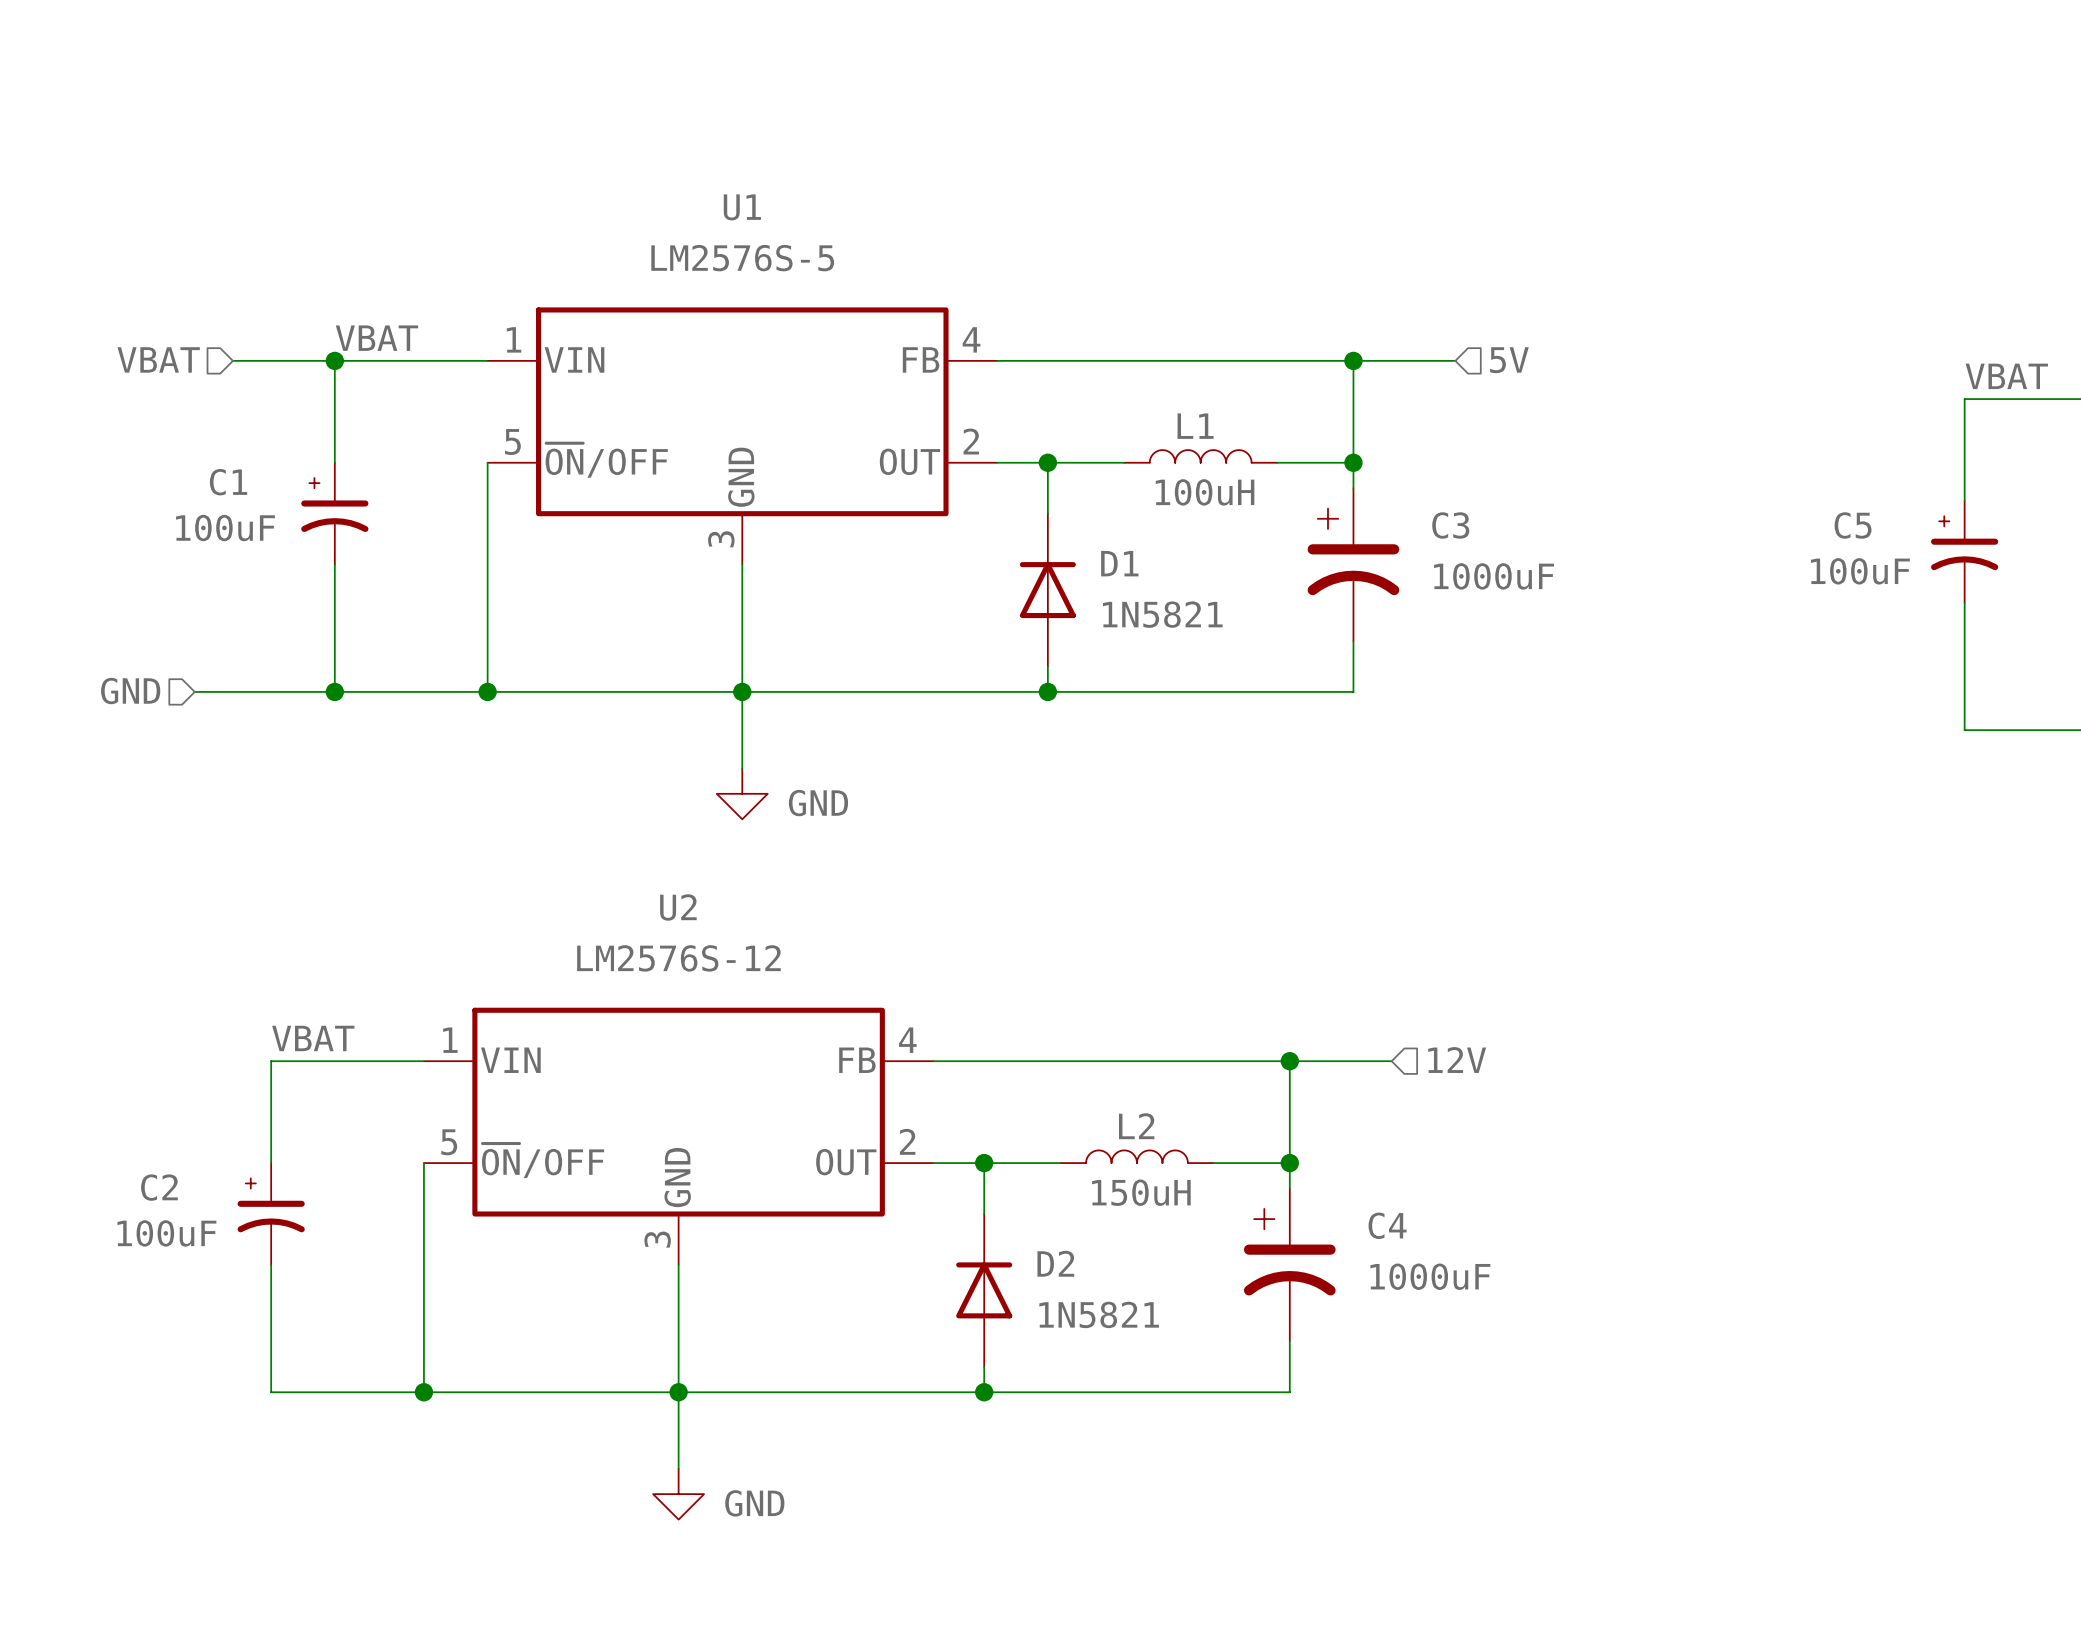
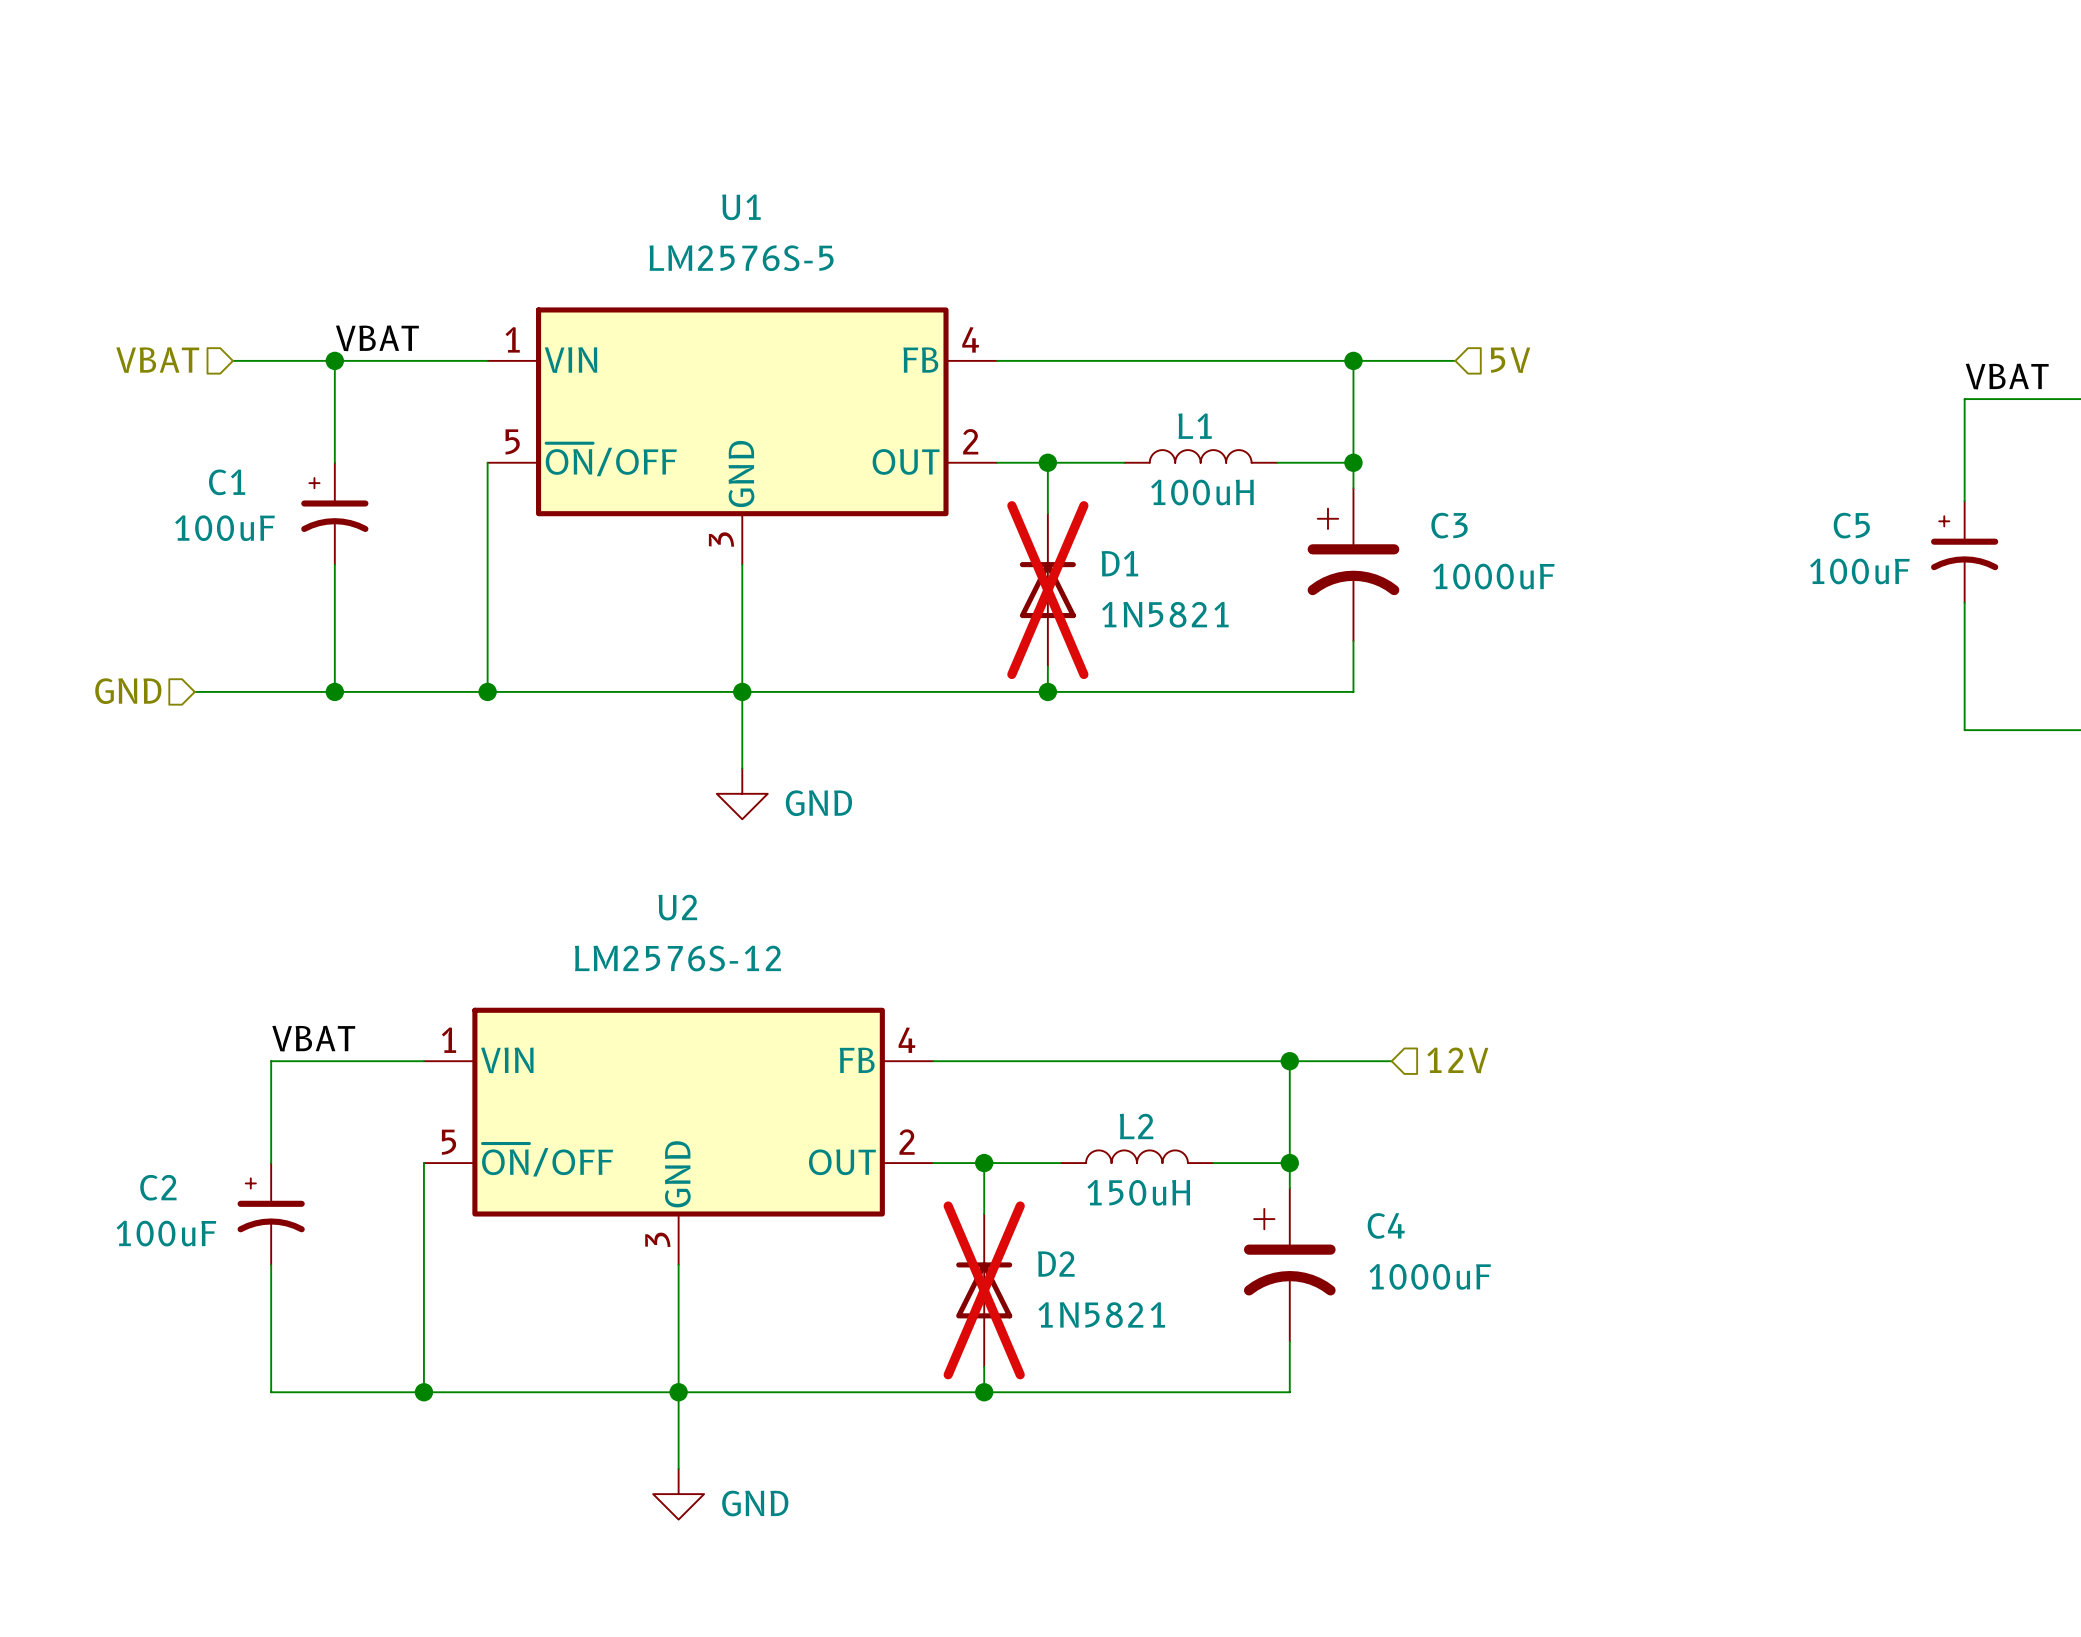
D1 do-not-place cross: none -> (1047, 590)
D2 do-not-place cross: none -> (984, 1290)

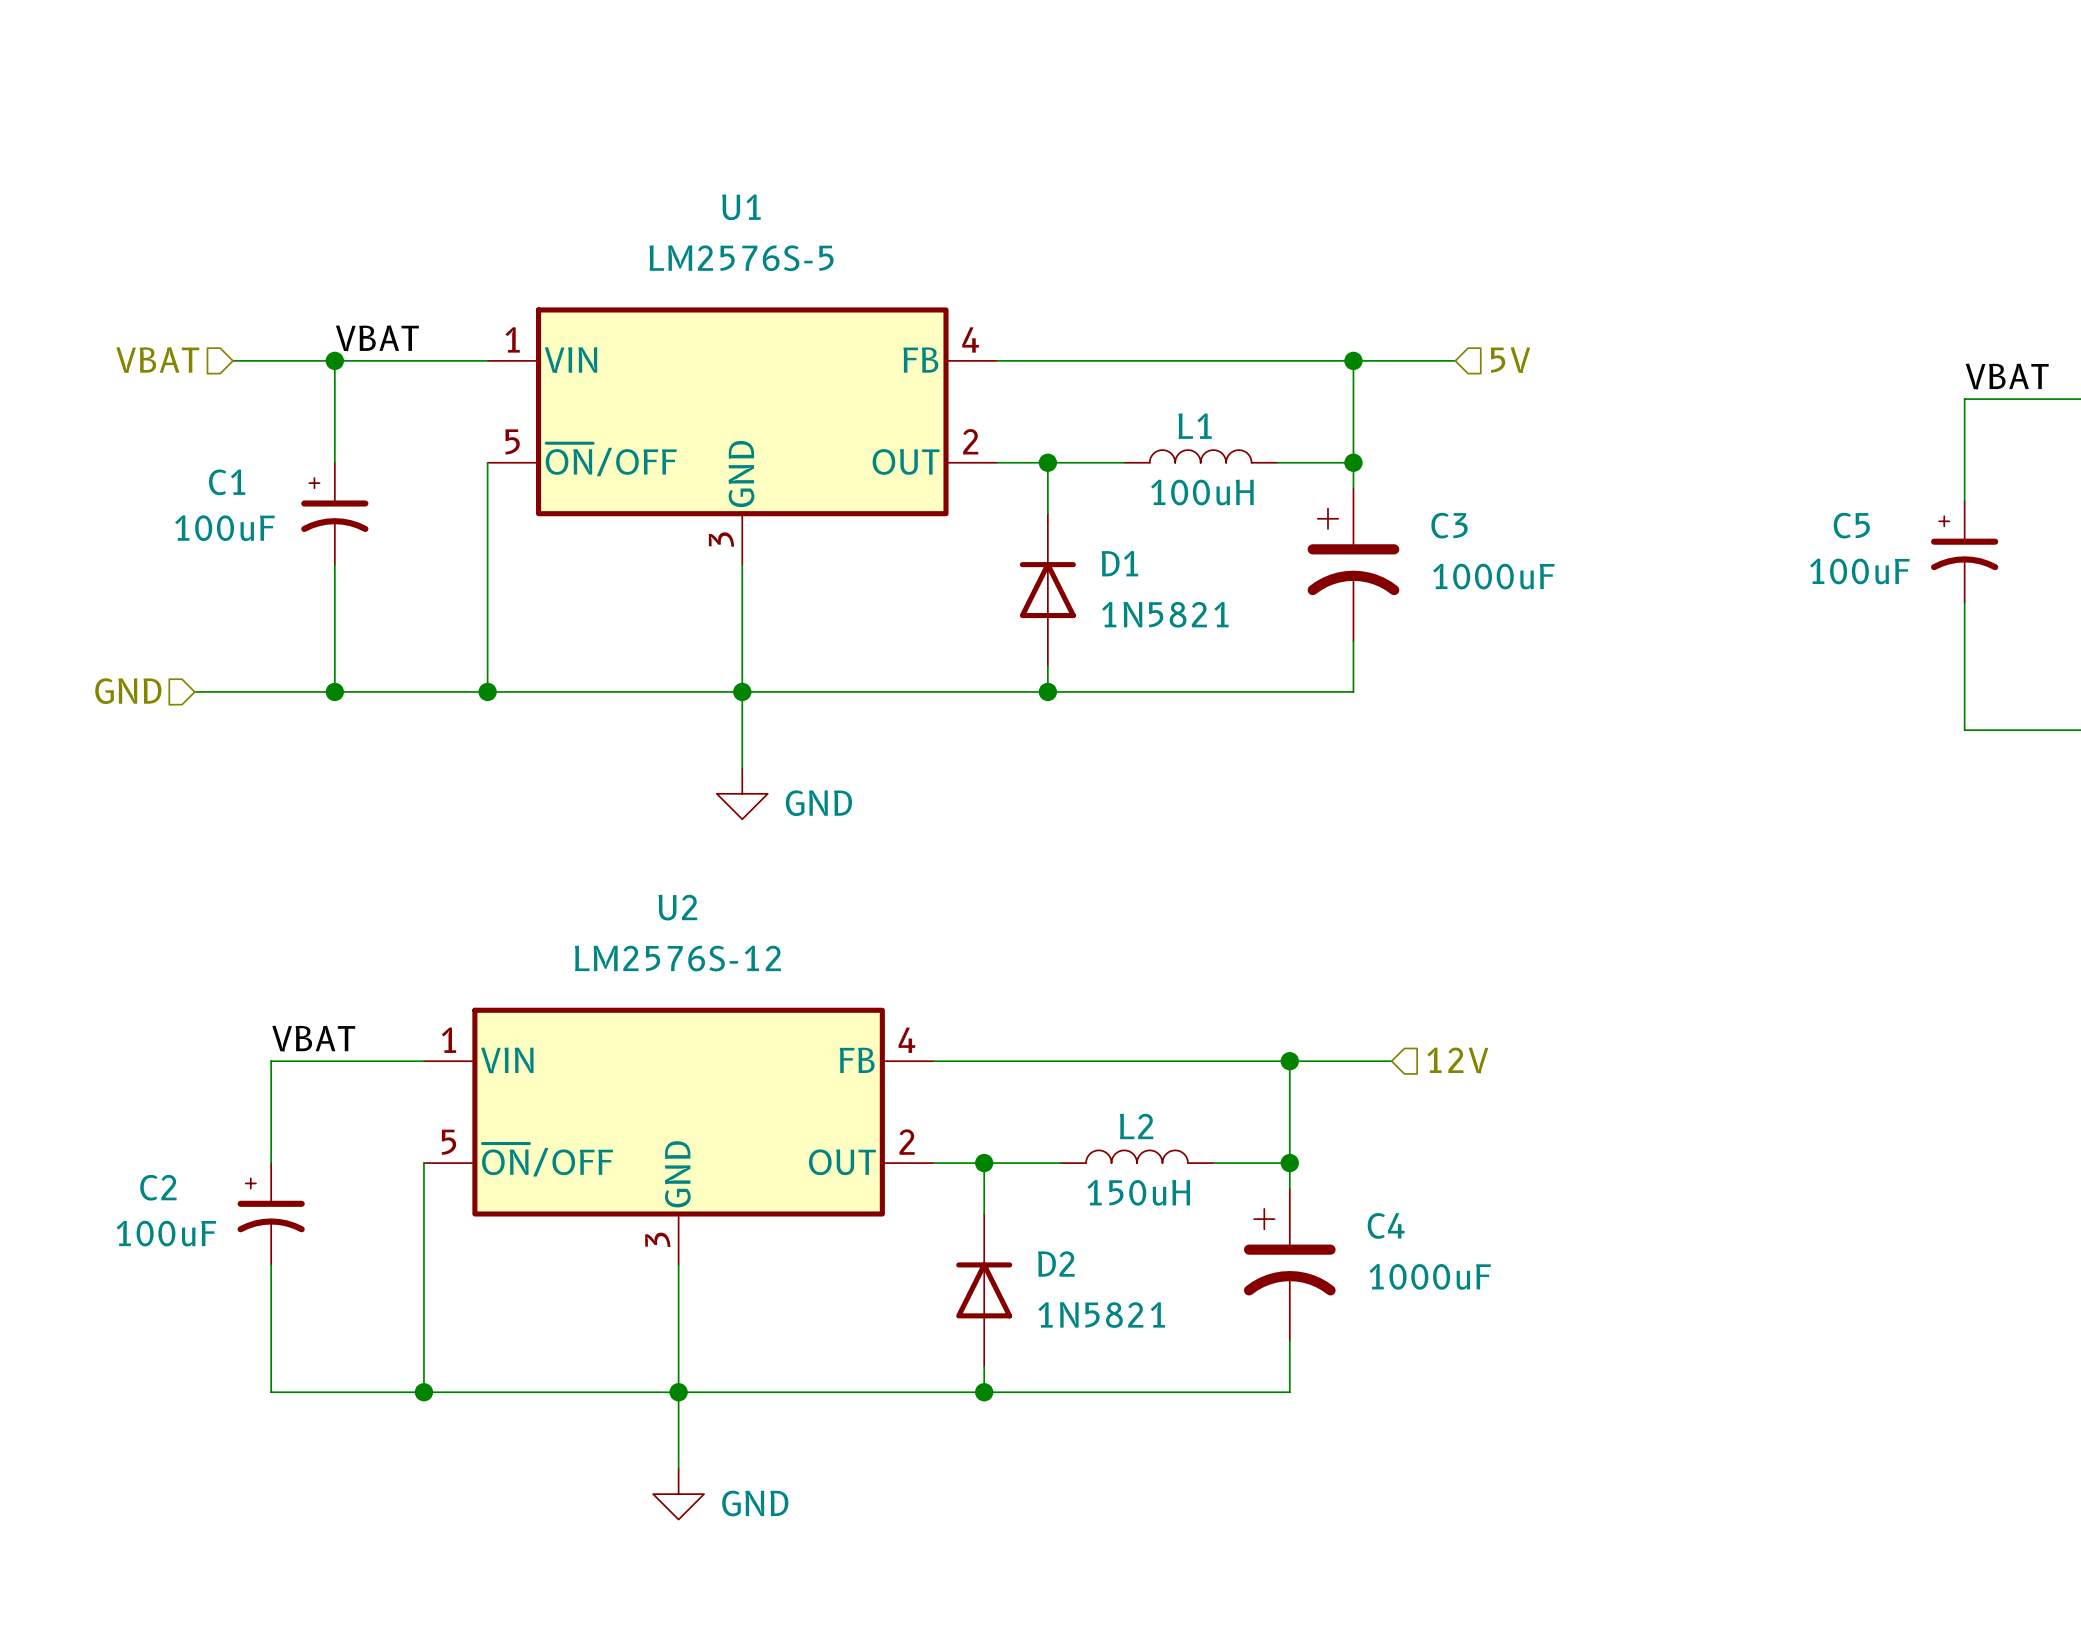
D1 do-not-place cross: (1047, 590) -> none
D2 do-not-place cross: (984, 1290) -> none

